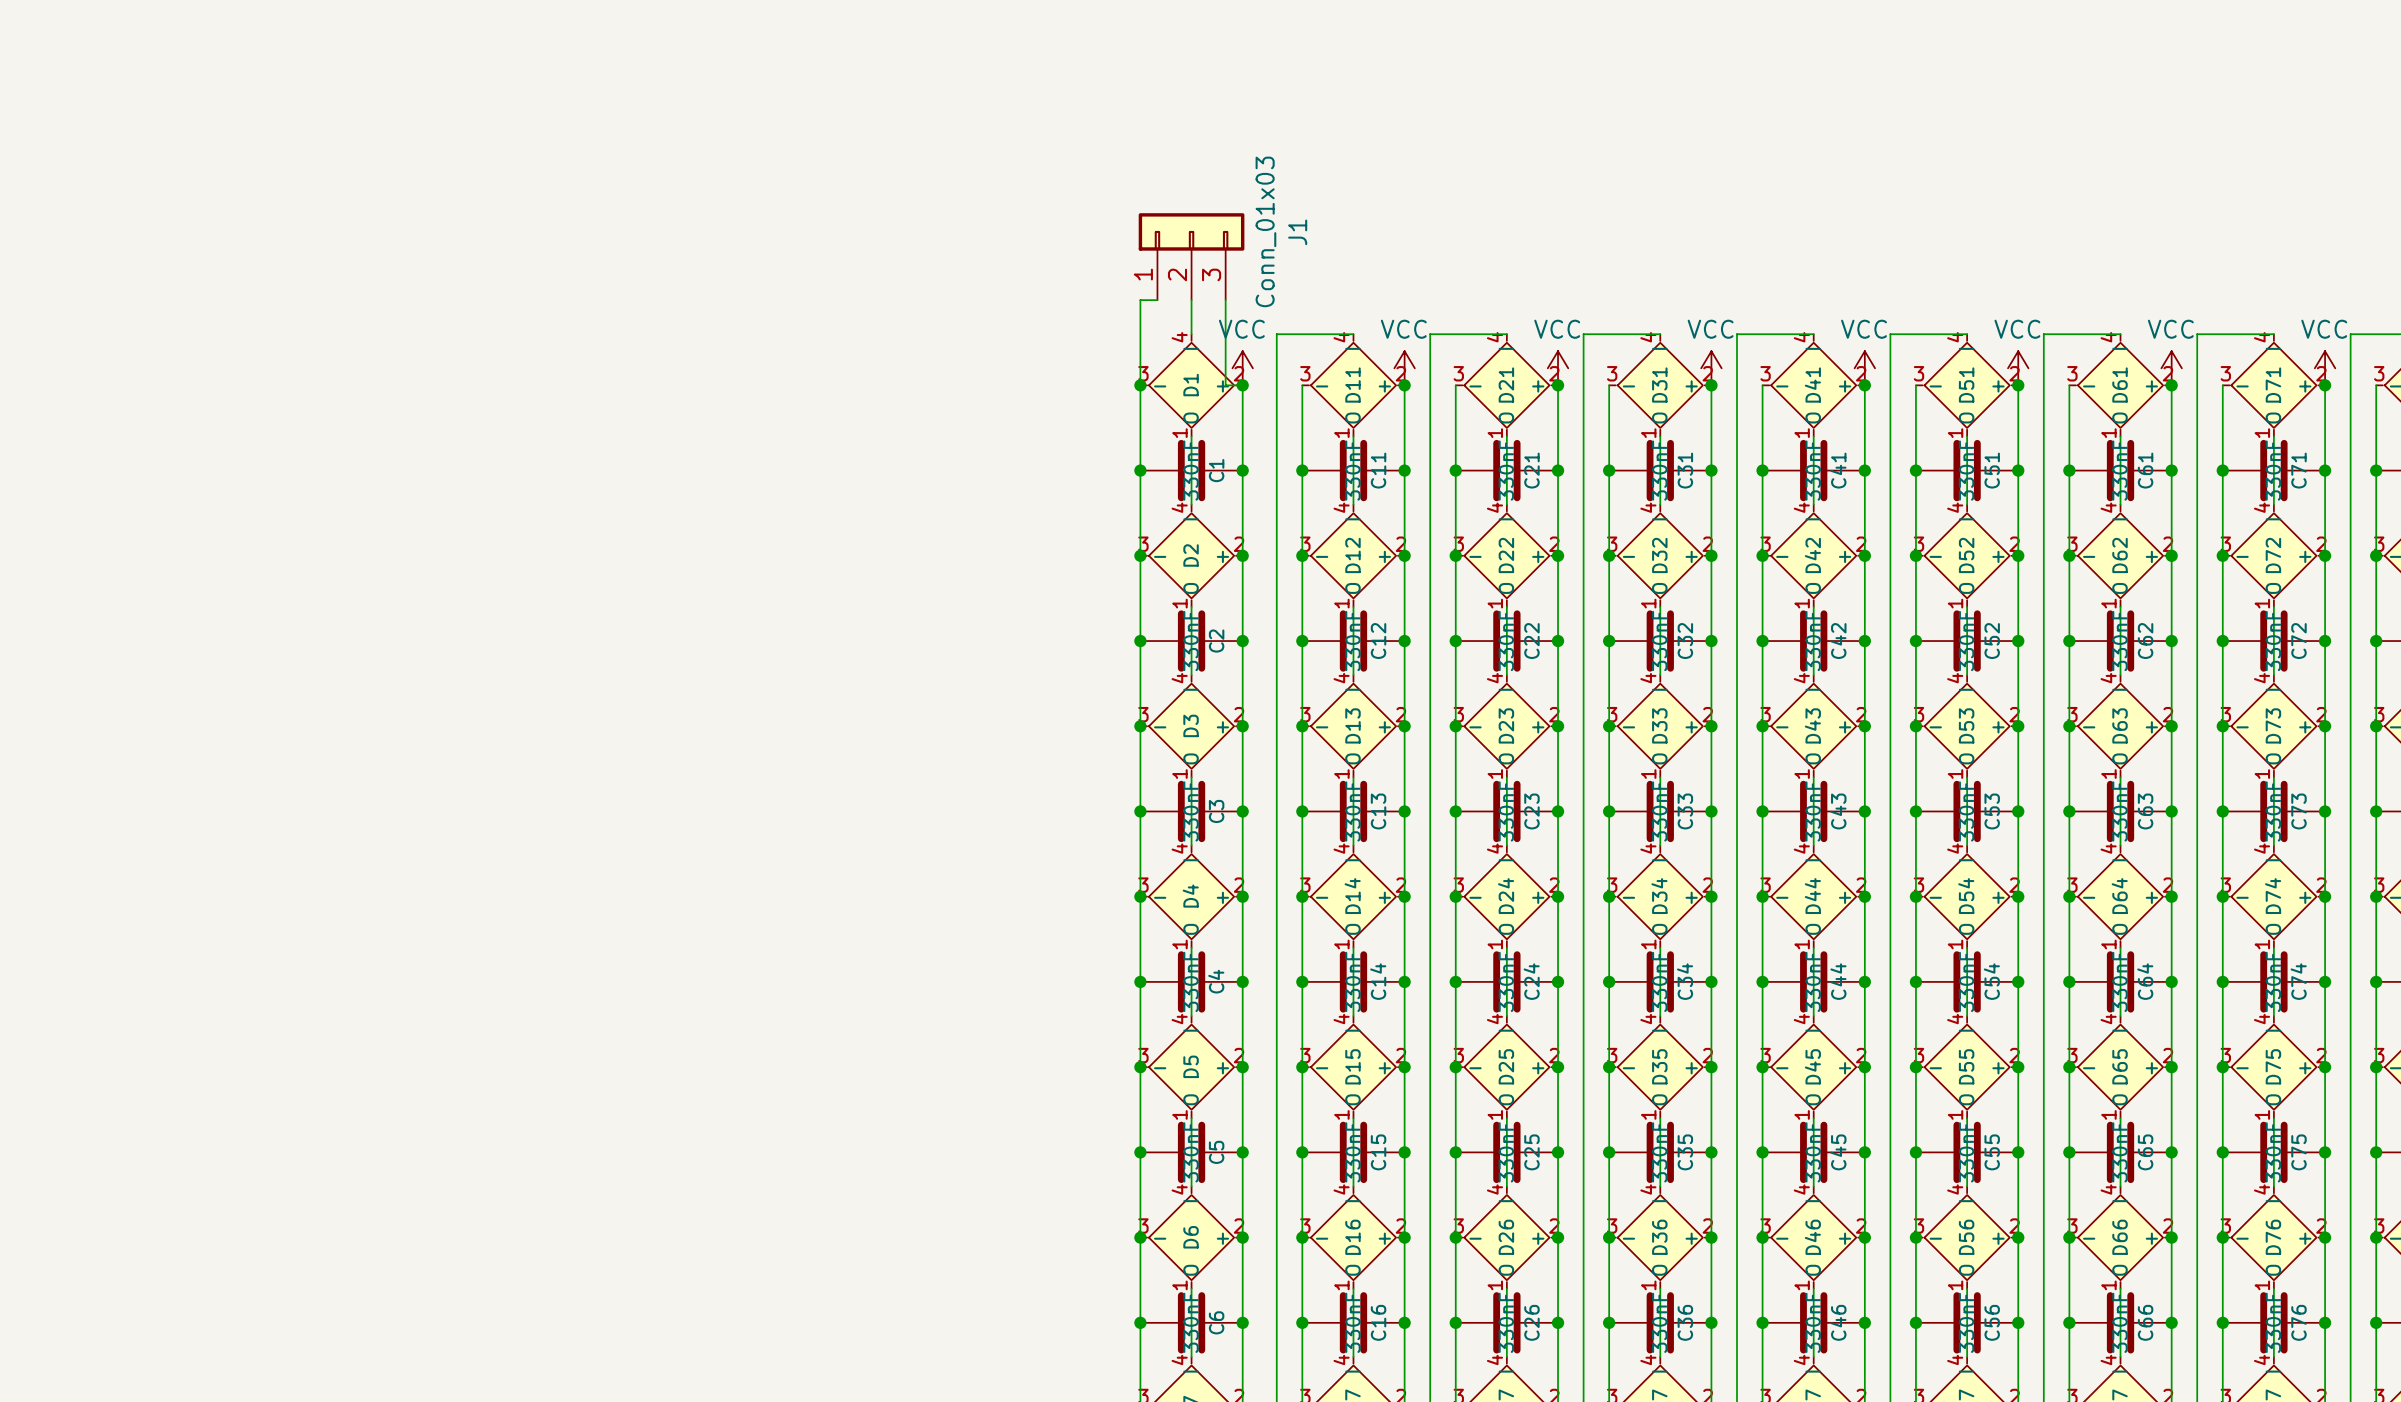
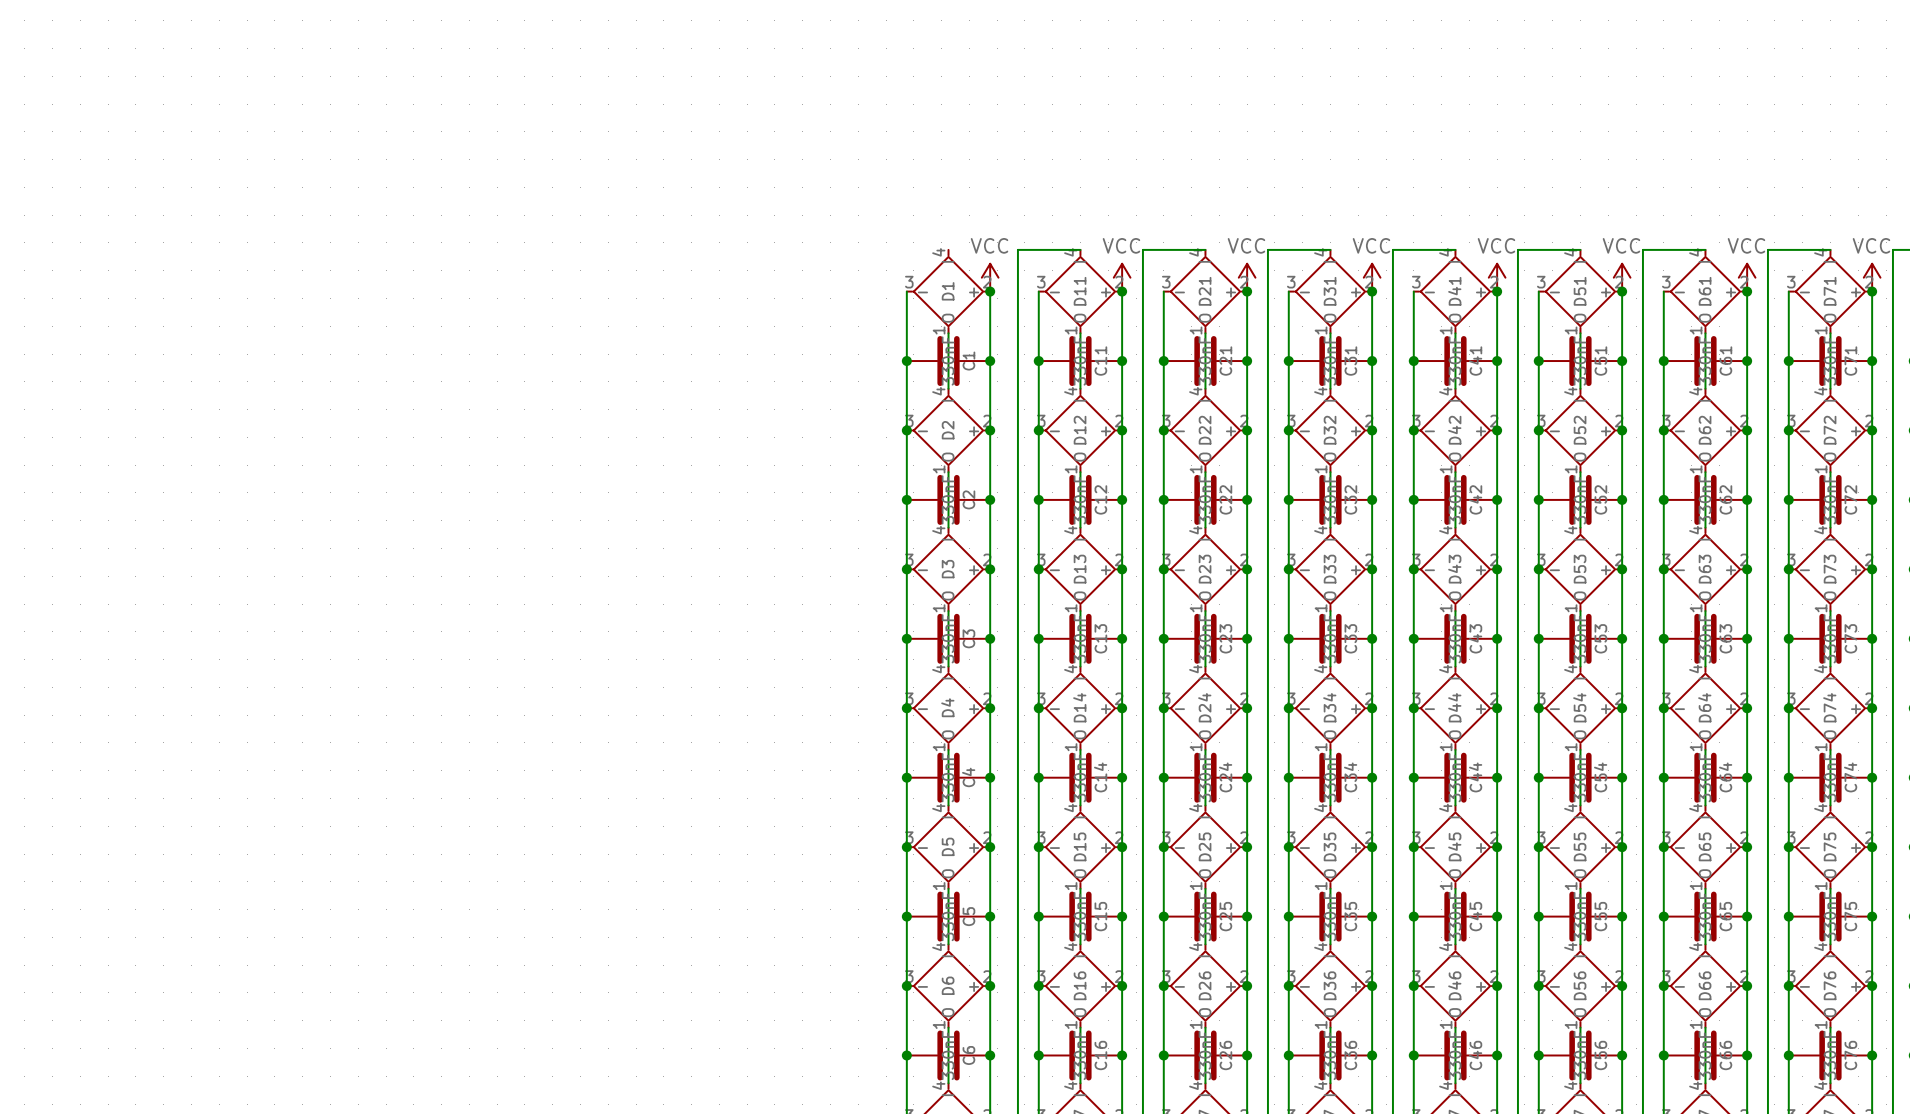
J1: Conn_01x03 (1191, 256) -> none
wire: (1157, 300) (1140, 300) (1140, 385) -> none
wire: (1191, 300) (1191, 334) -> none
wire: (1225, 300) (1225, 385) (1242, 385) -> none
junction: (1140, 385) -> none

